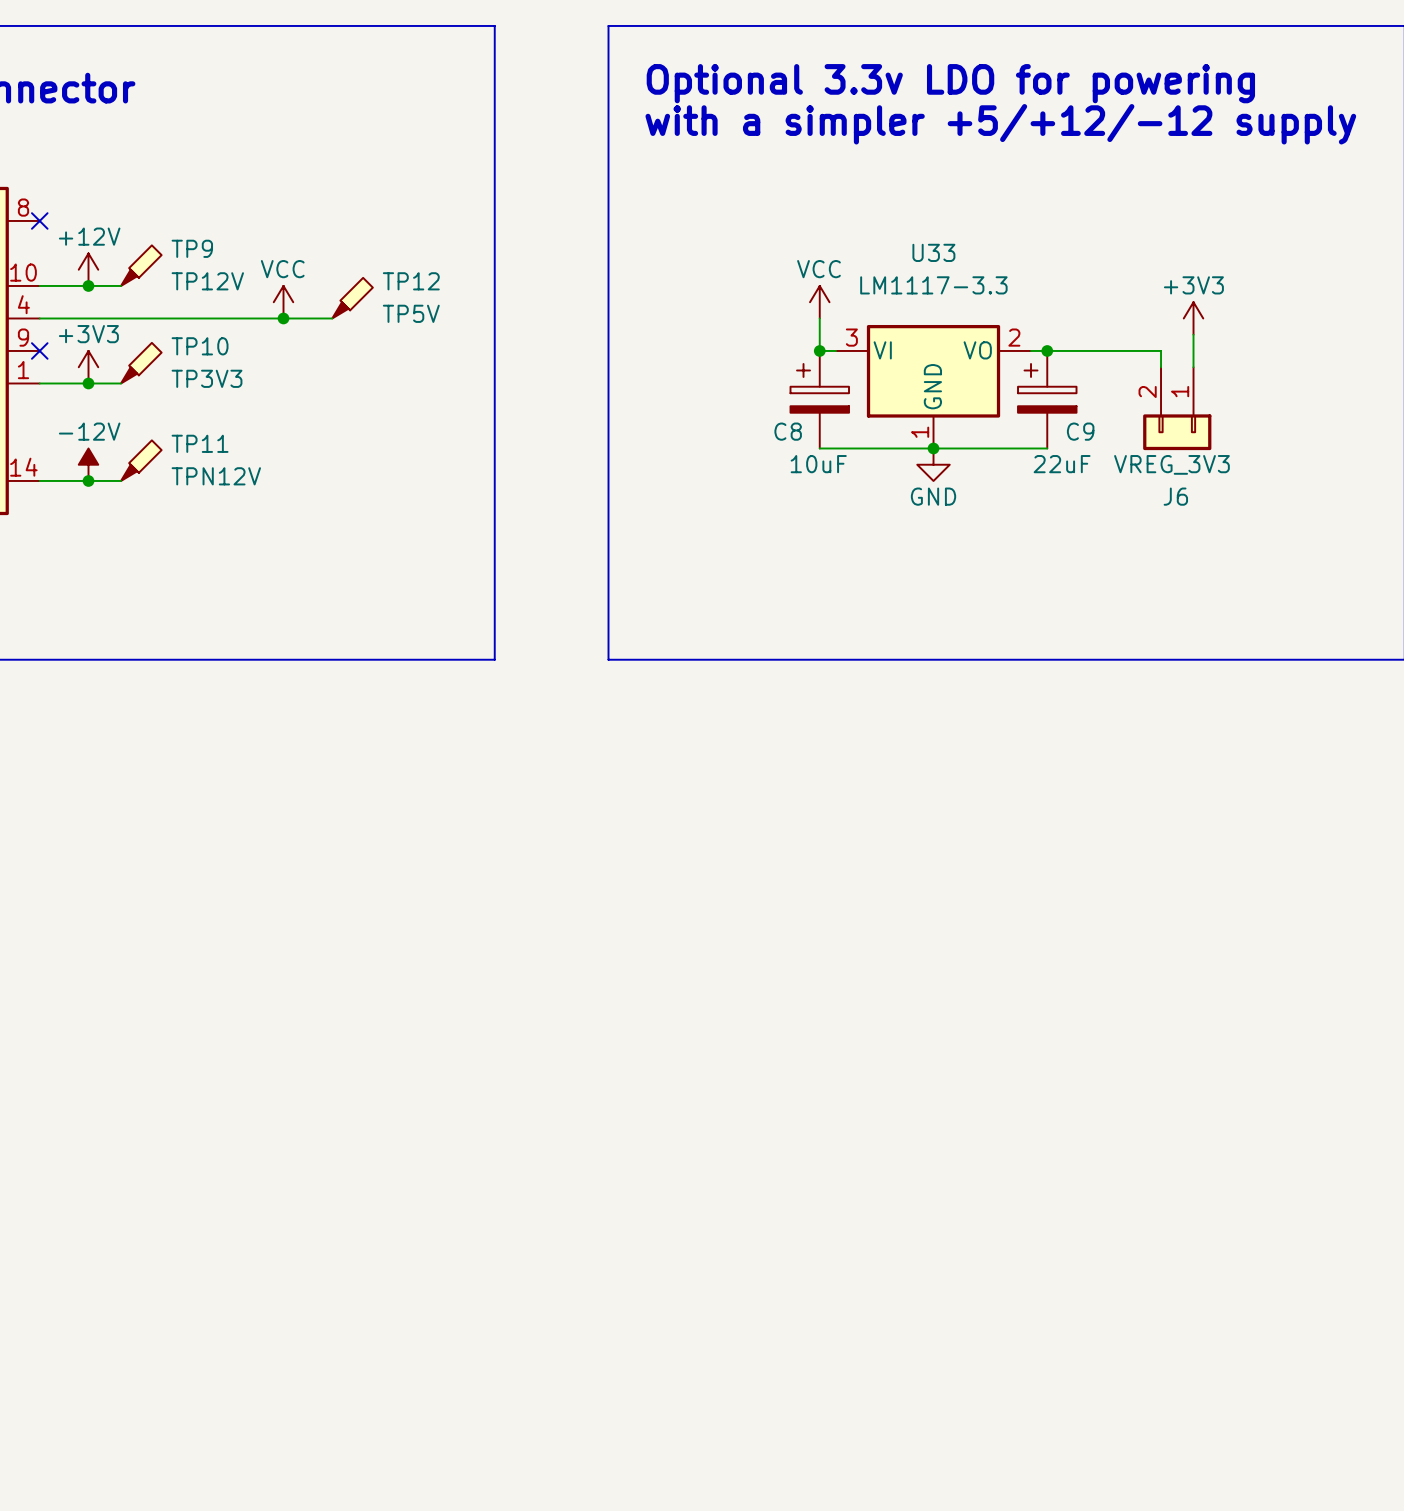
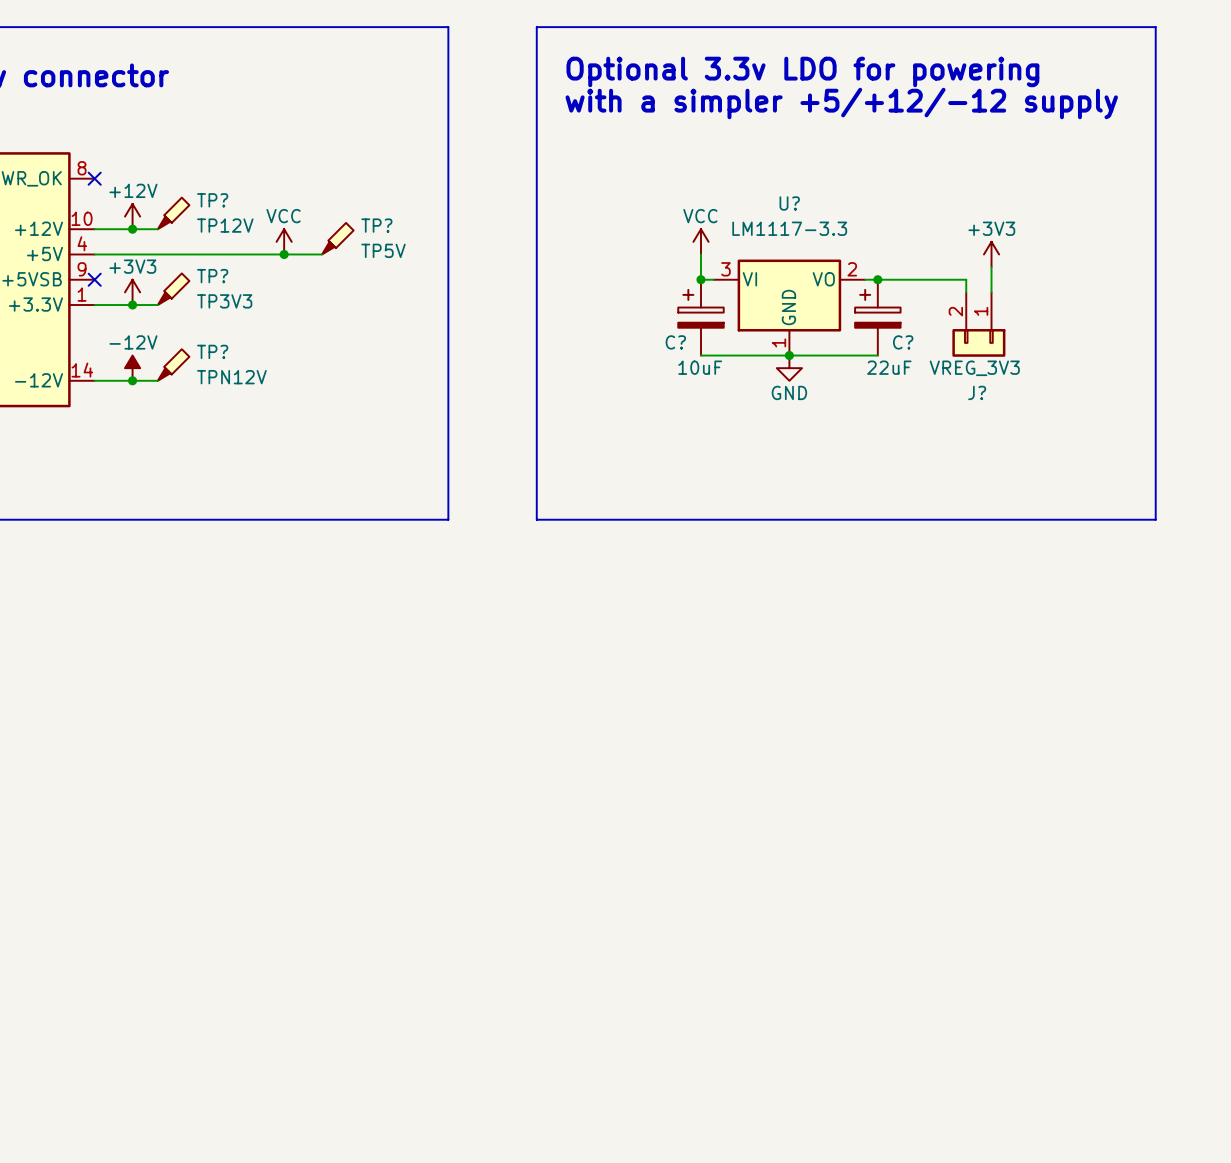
TP9 name: TP9 (192, 248) -> TP? (212, 200)
U33 name: U33 (933, 252) -> U? (789, 203)
TP12 name: TP12 (411, 281) -> TP? (376, 225)
TP10 name: TP10 (200, 346) -> TP? (212, 276)
C8 name: C8 (788, 431) -> C? (675, 342)
C9 name: C9 (1080, 431) -> C? (903, 342)
TP11 name: TP11 (200, 443) -> TP? (212, 351)
J6 name: J6 (1175, 496) -> J? (977, 392)

